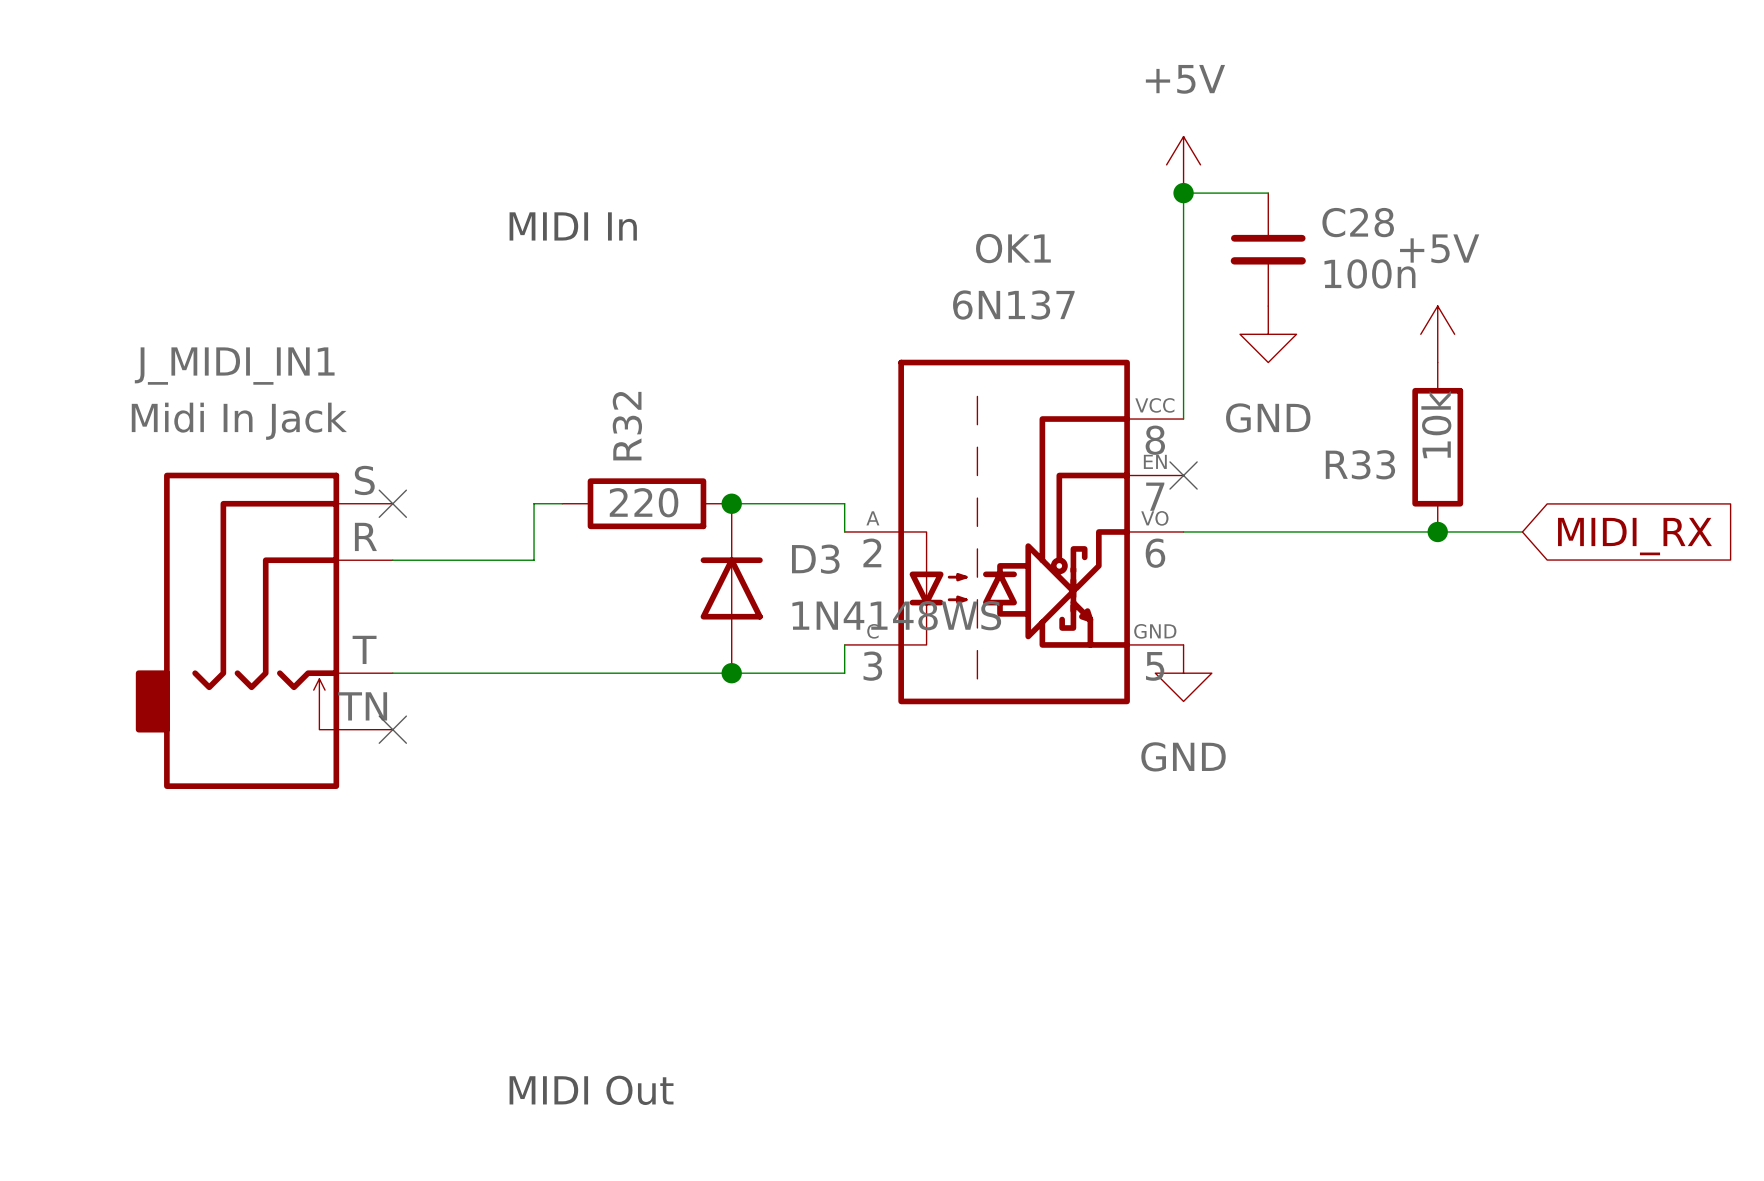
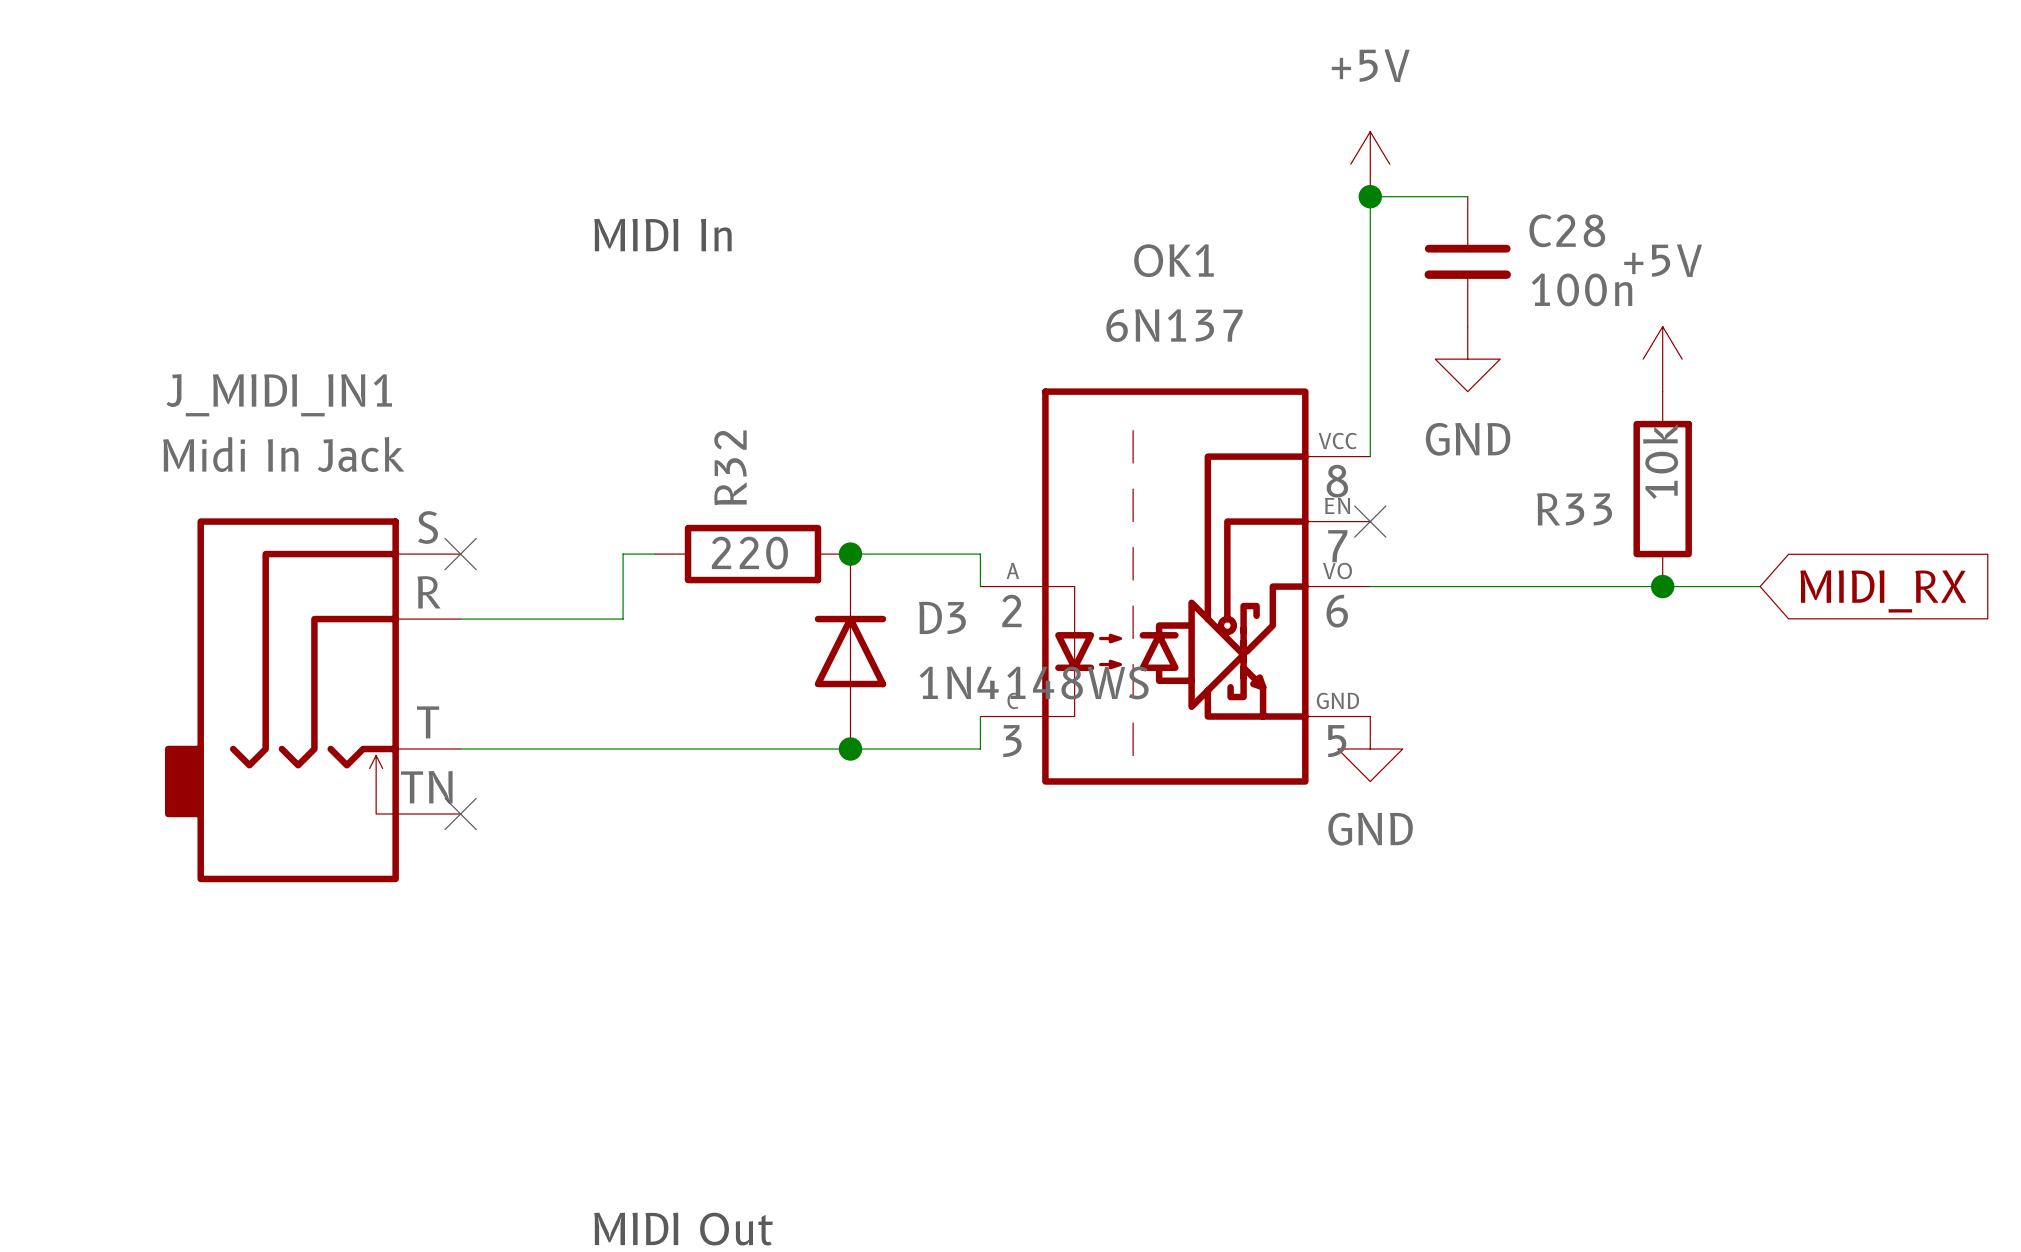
power symbol text position: GND (1268, 417) -> GND (1468, 439)
power symbol text position: GND (1183, 756) -> GND (1370, 829)

